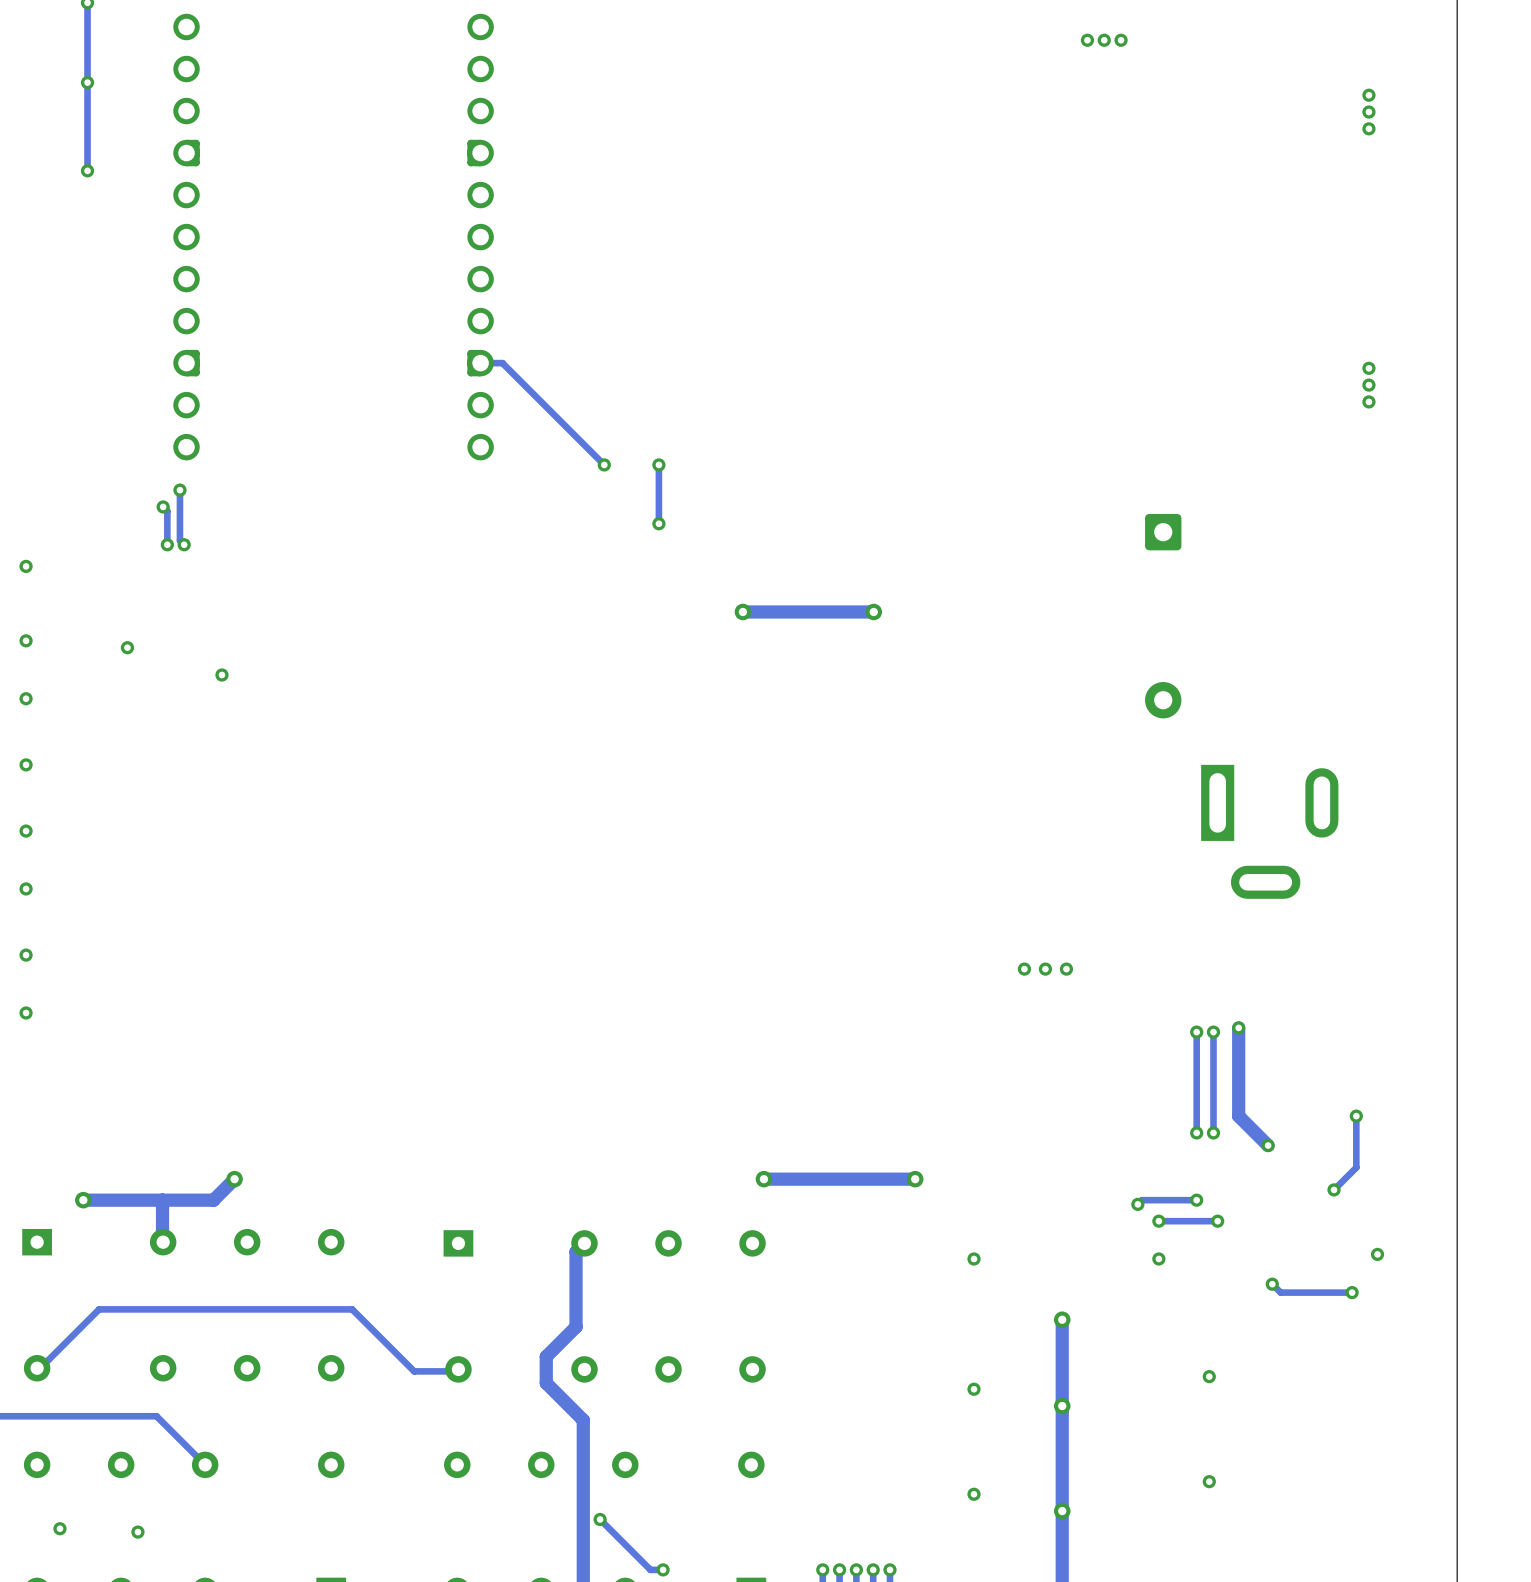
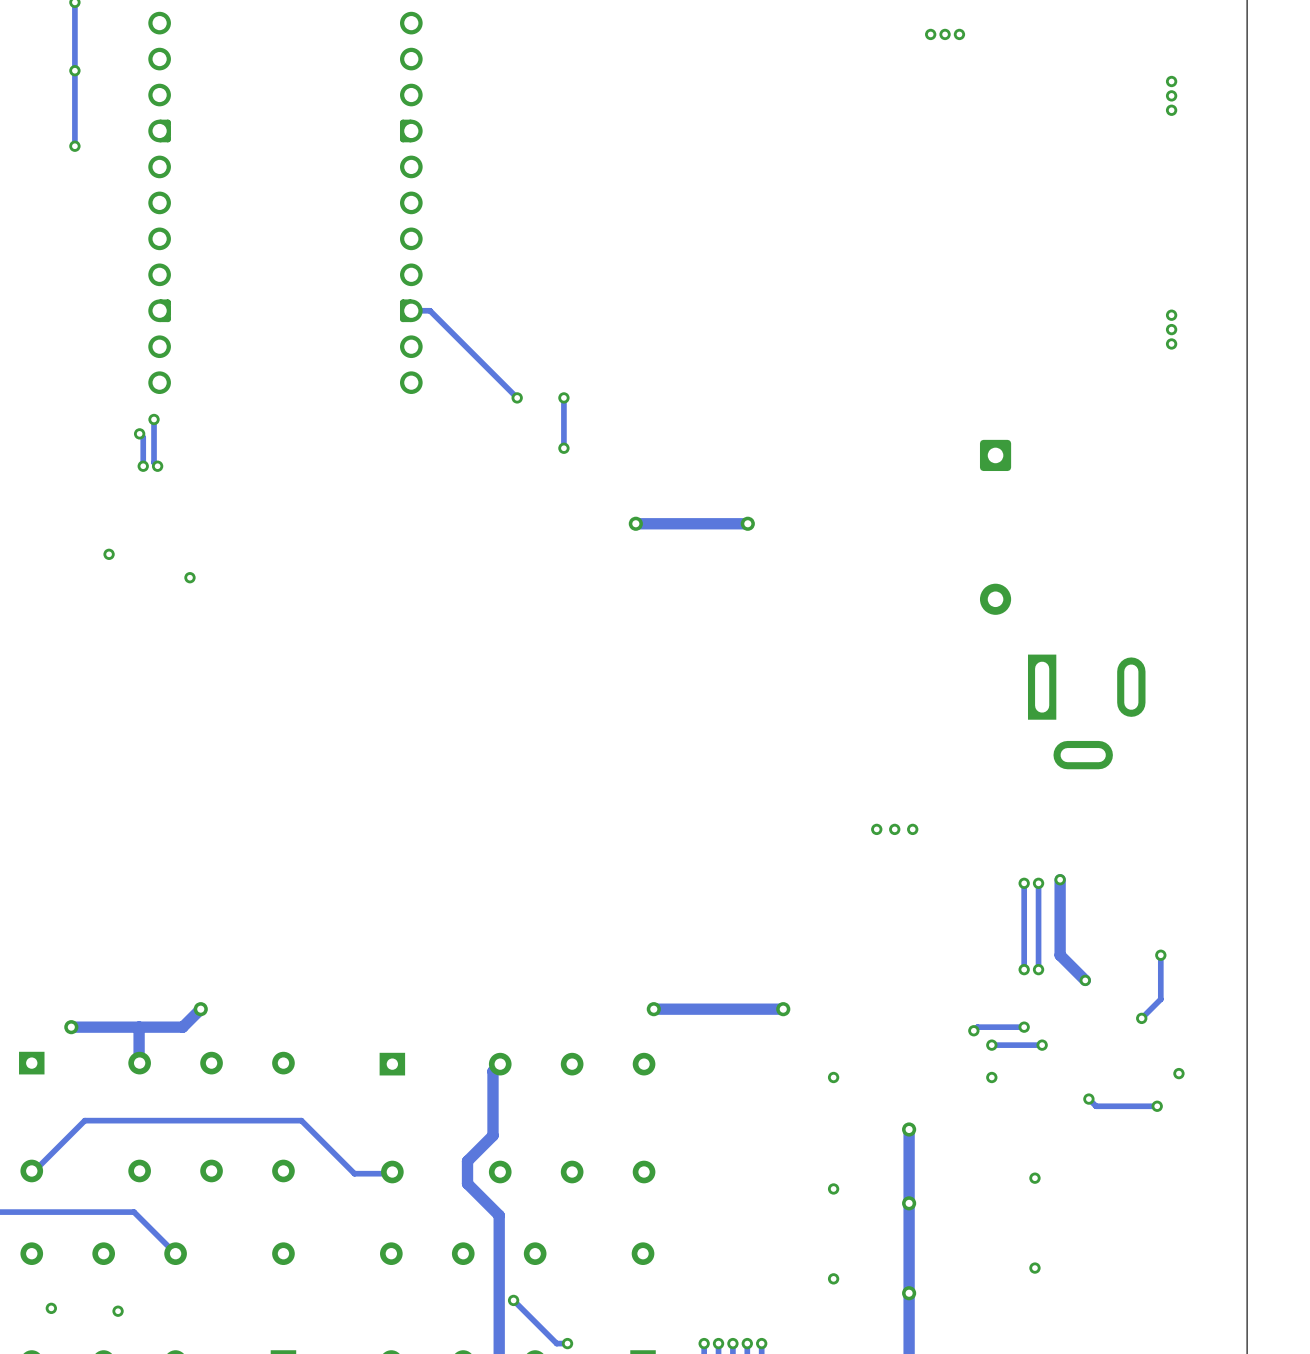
via: (26, 566) -> none
via: (26, 640) -> none
via: (26, 698) -> none
via: (26, 764) -> none
via: (26, 831) -> none
via: (26, 888) -> none
via: (26, 955) -> none
via: (26, 1012) -> none

